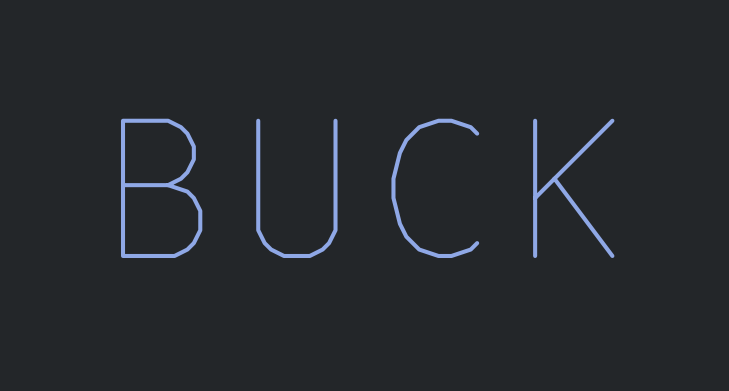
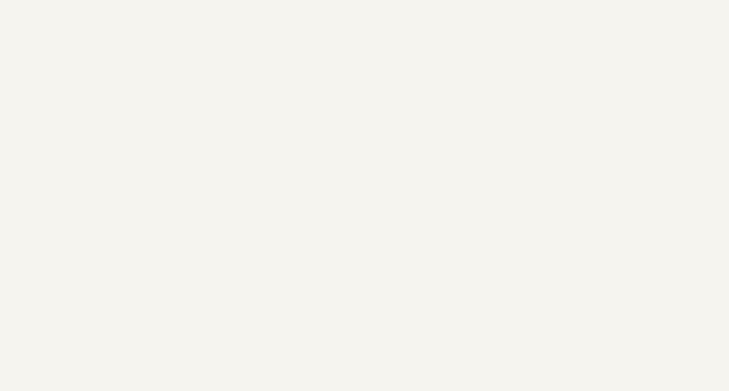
text: BUCK (367, 188) -> none

